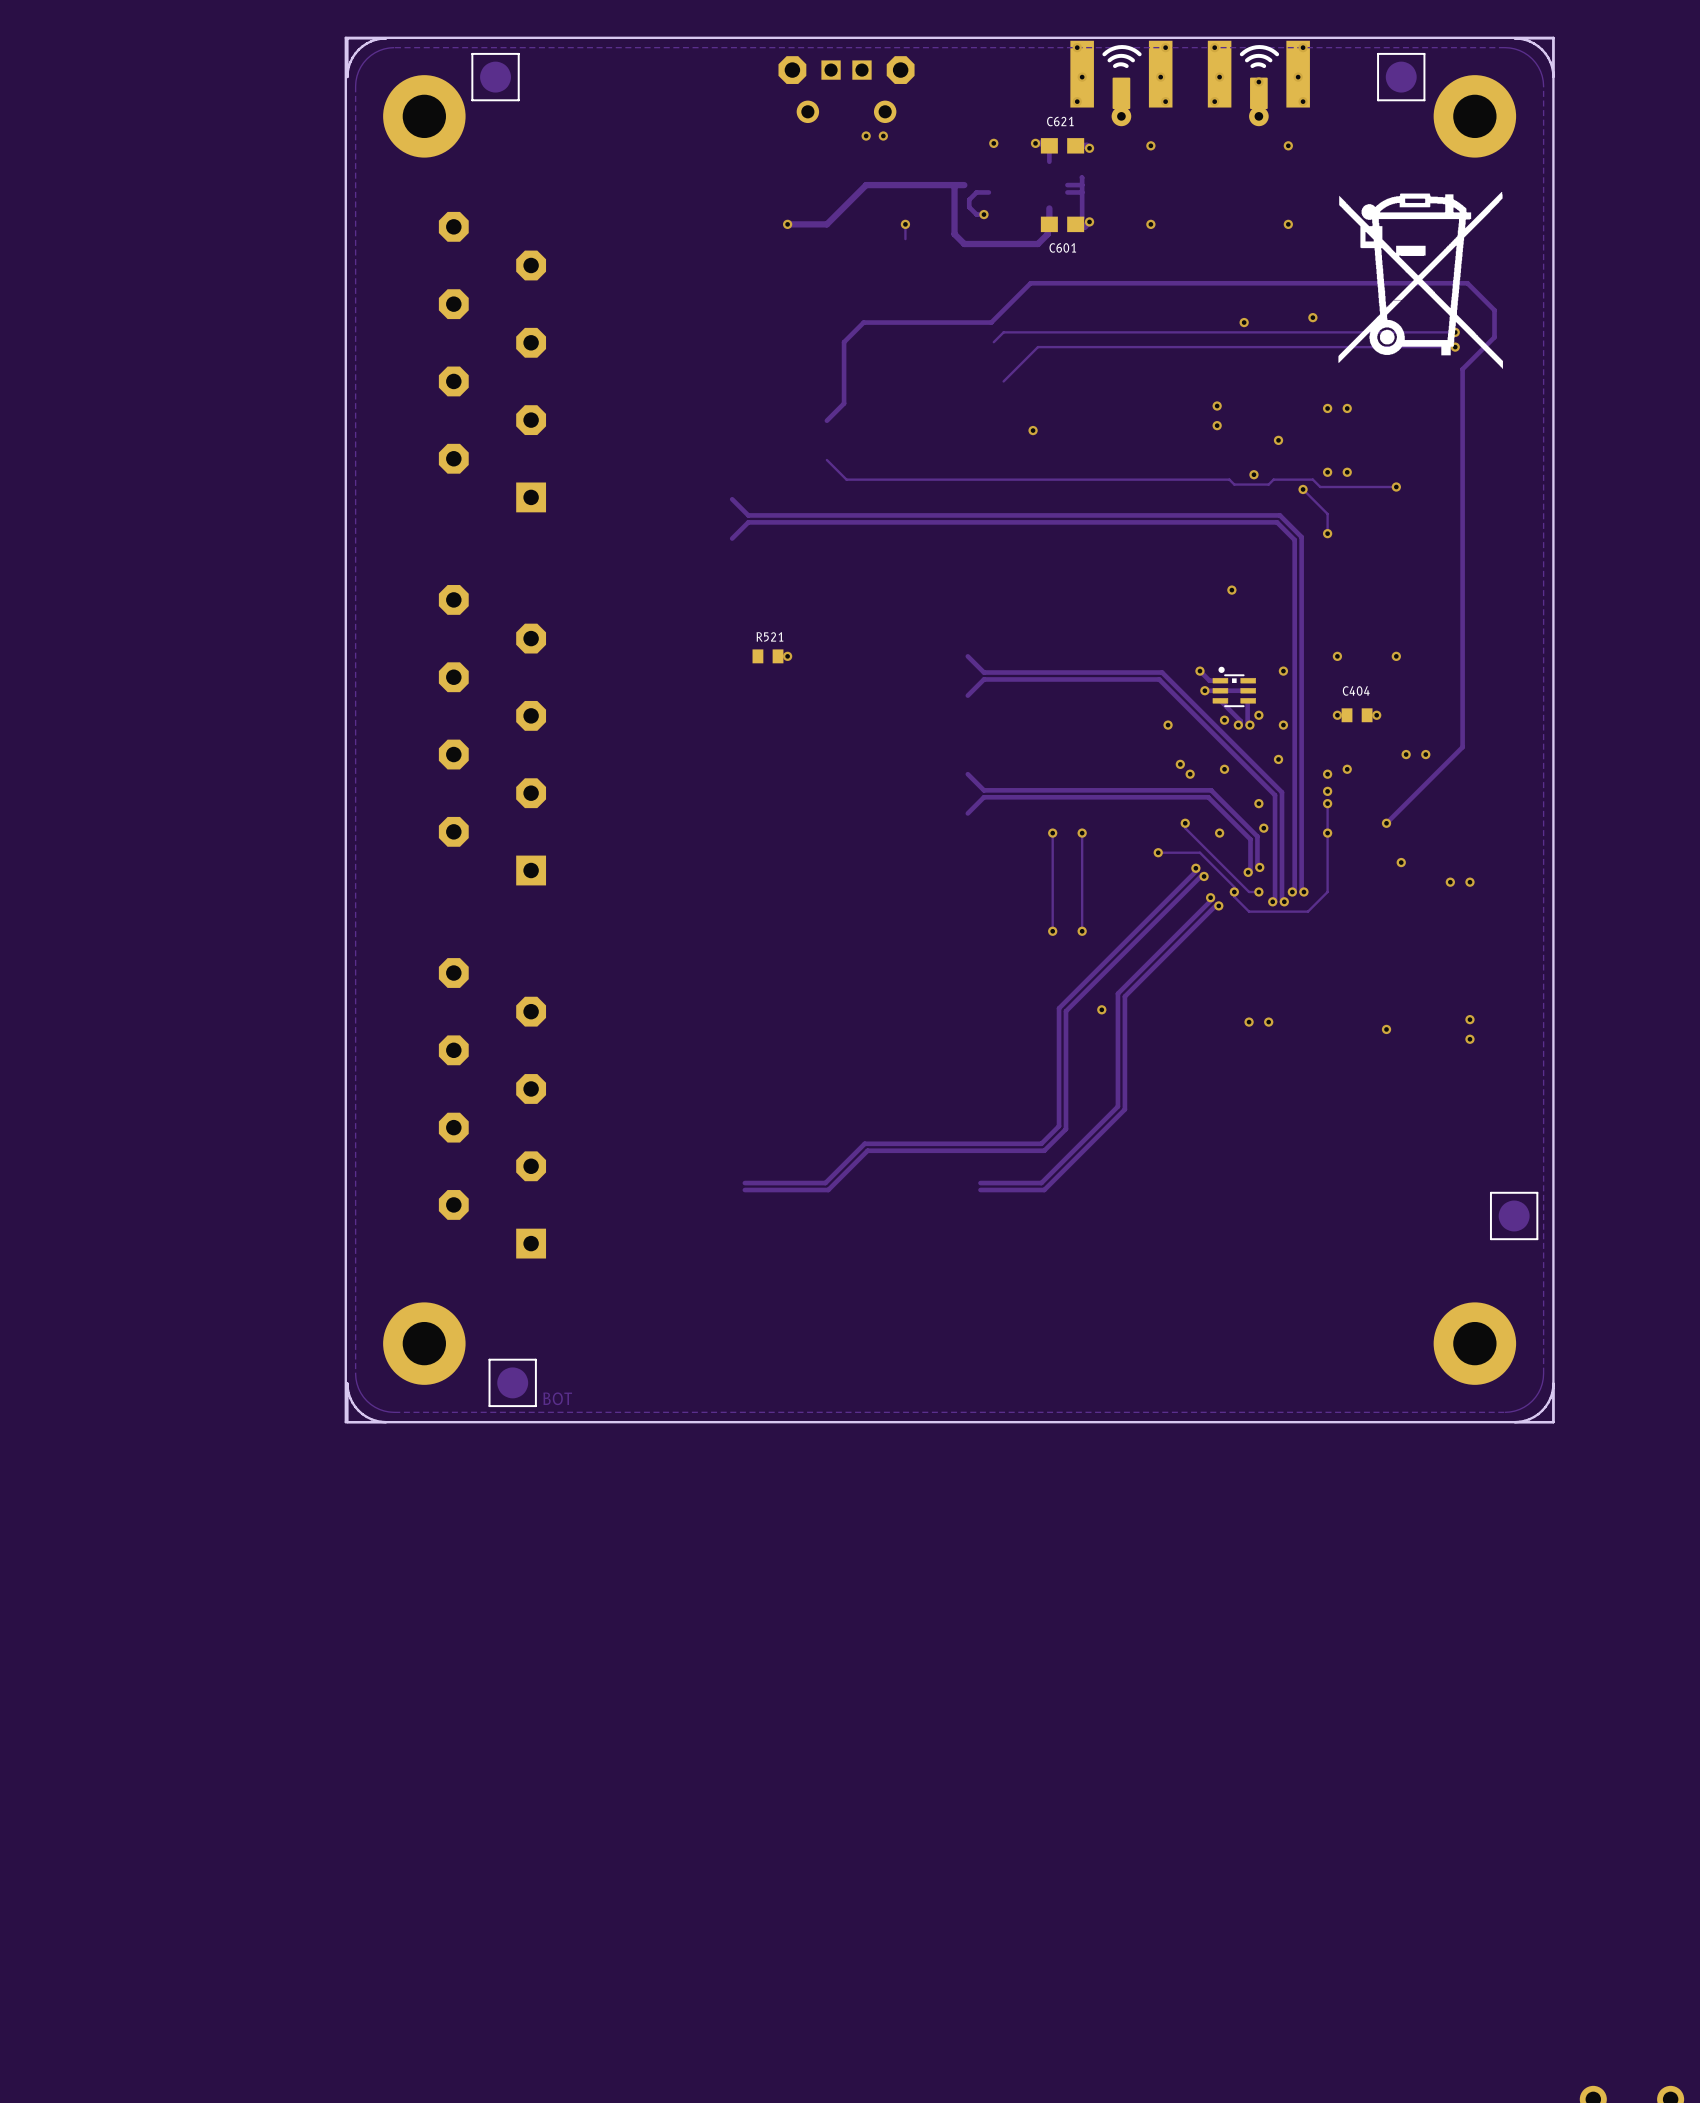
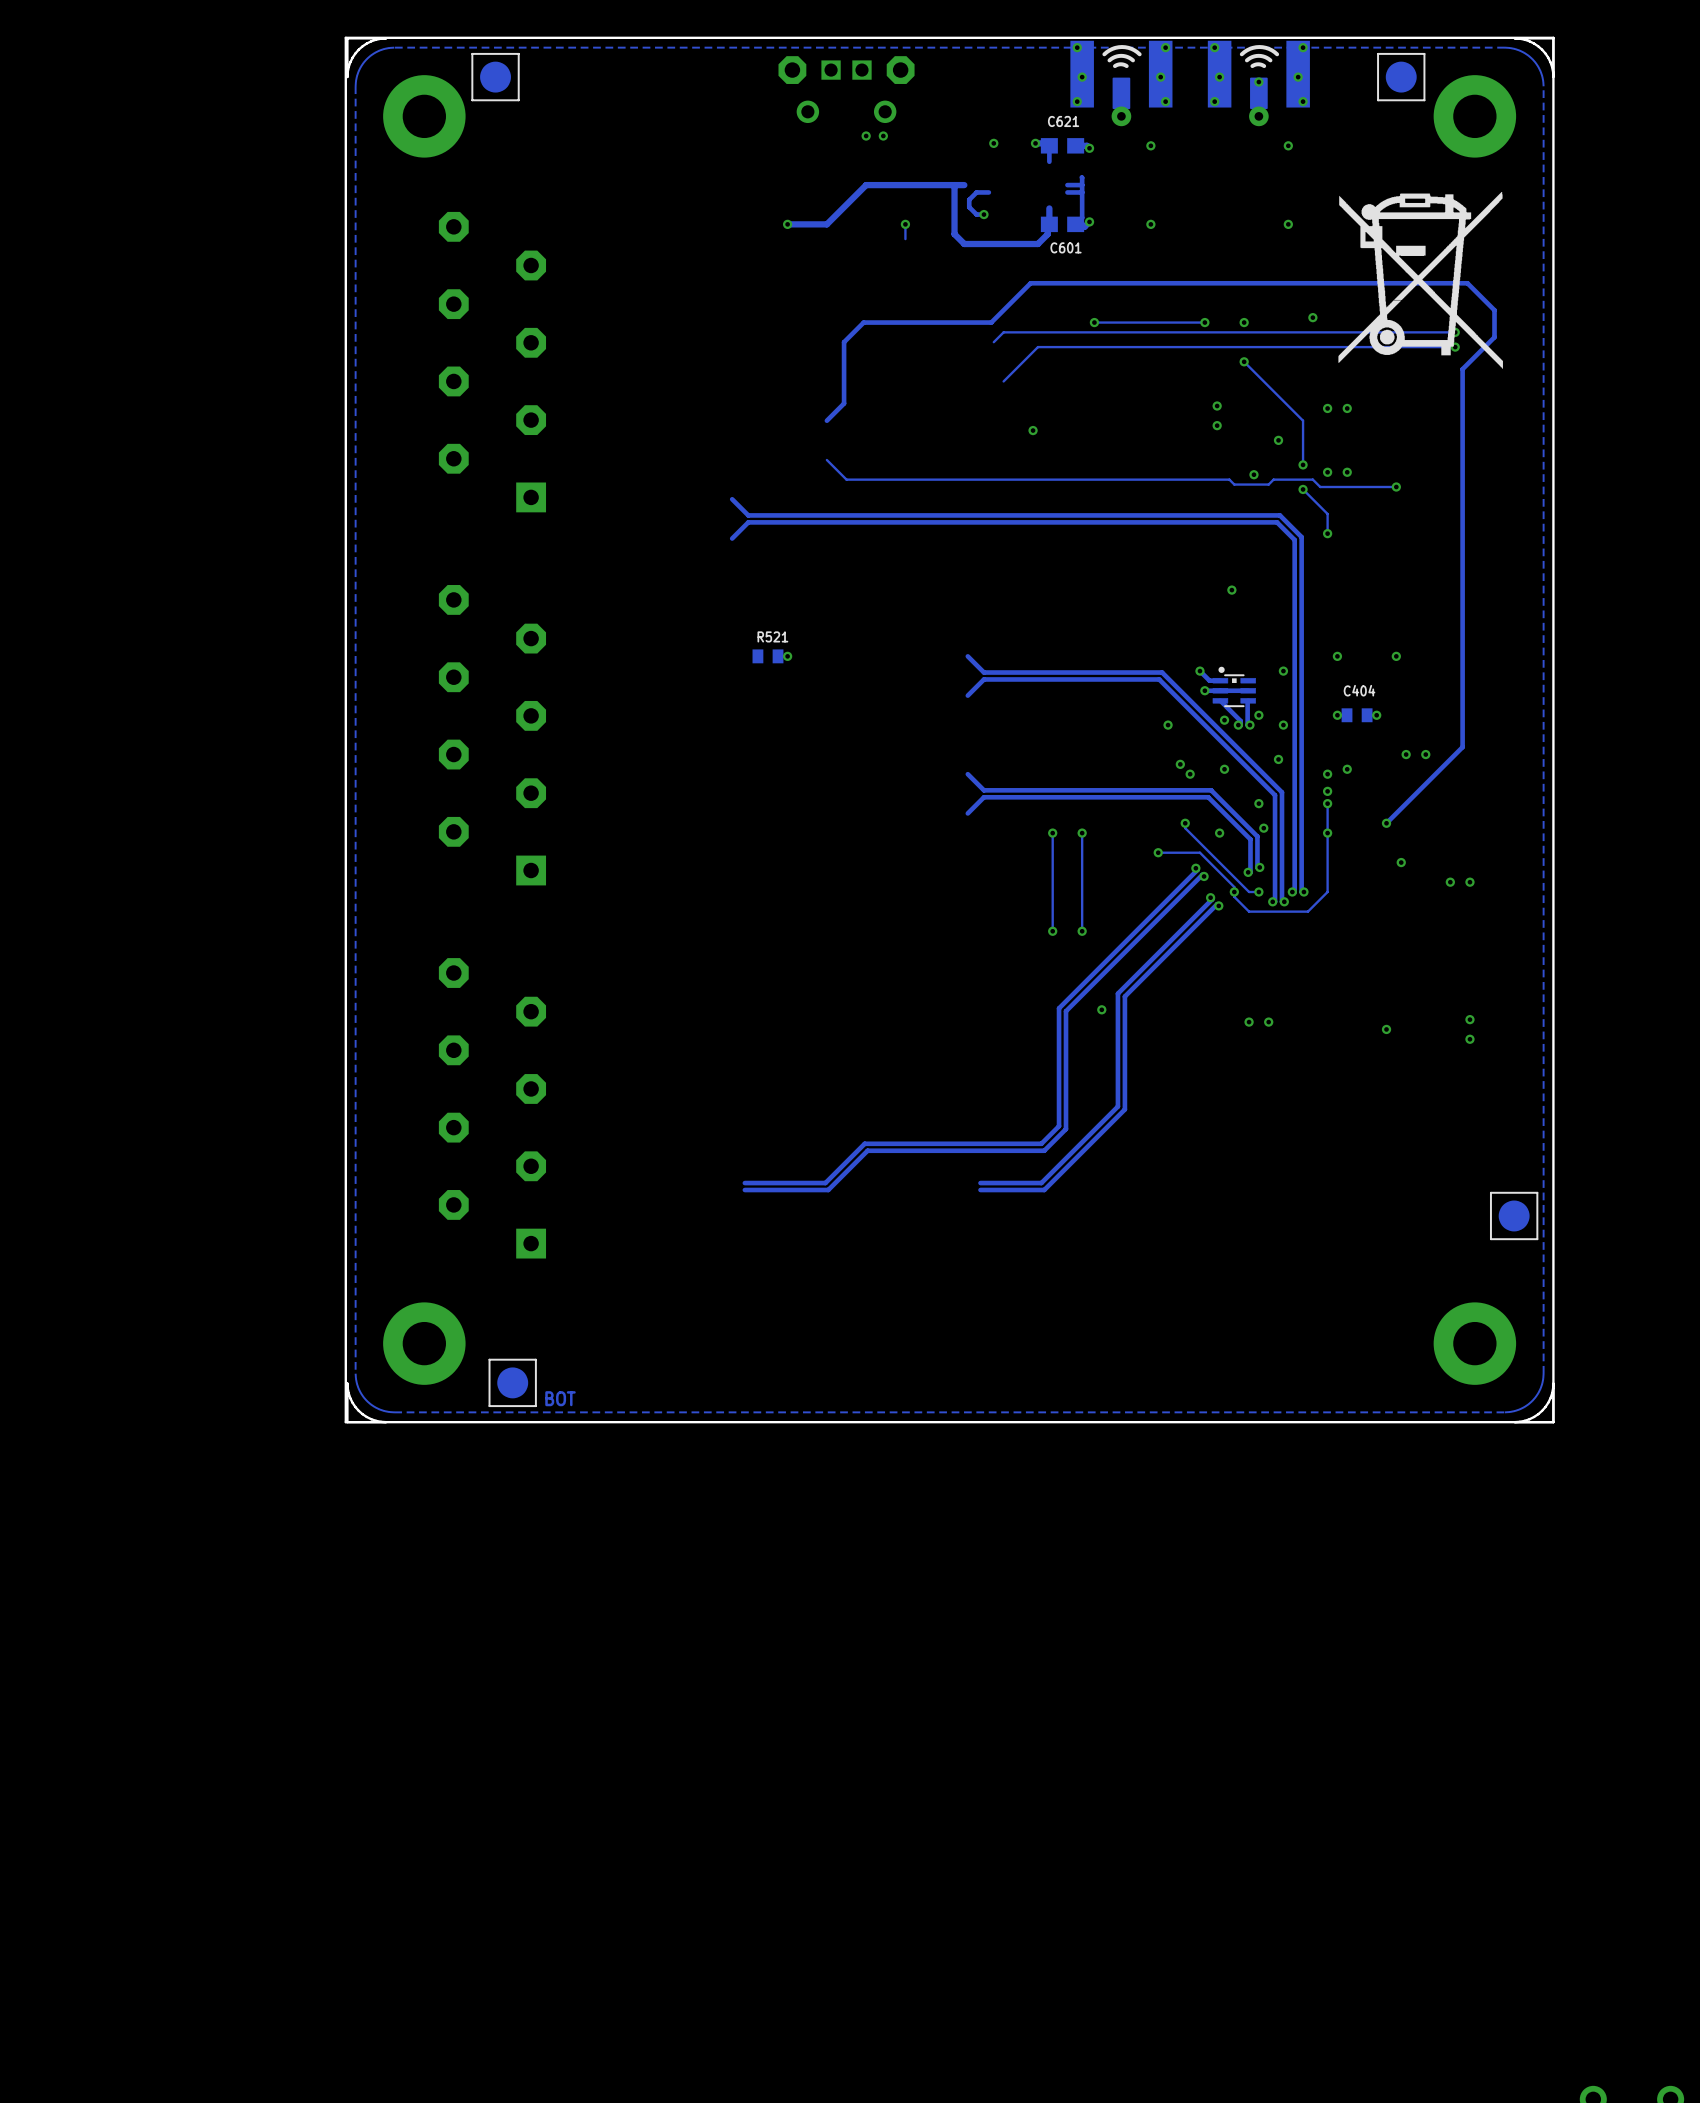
via: none -> (1094, 322)
track: none -> (1204, 322) (1094, 322)
via: none -> (1204, 322)
track: none -> (1244, 361) (1303, 420) (1303, 464)
via: none -> (1244, 361)
via: none -> (1303, 464)

